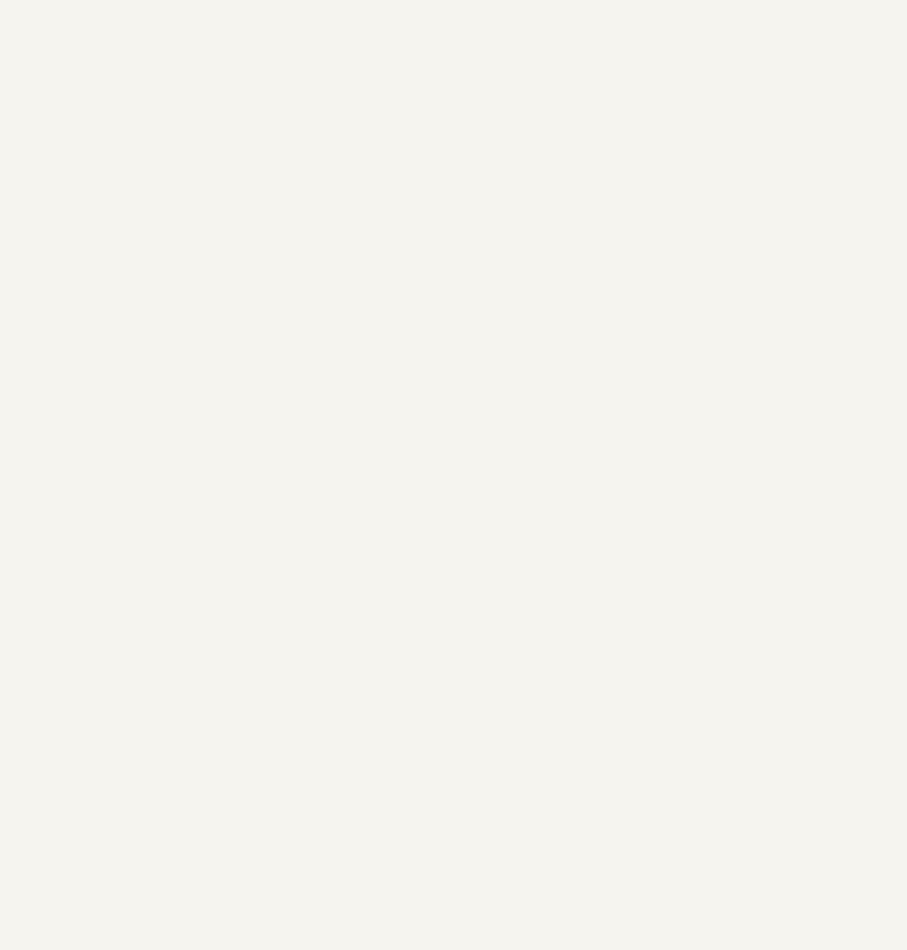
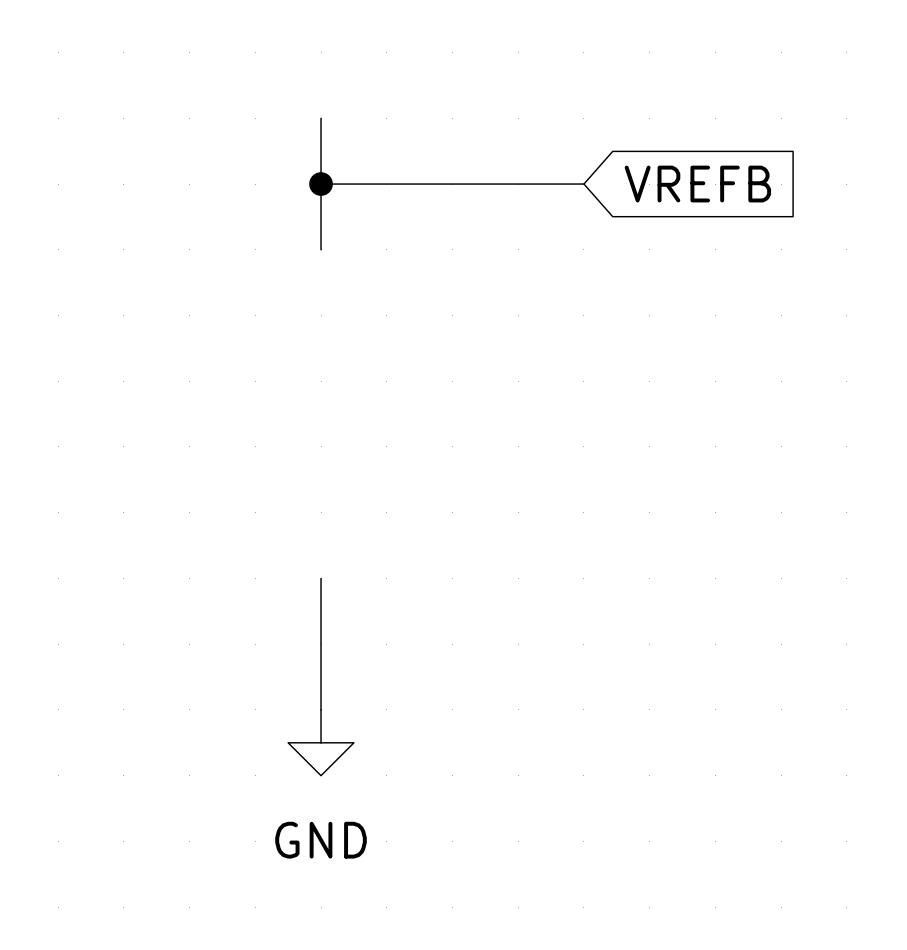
wire: none -> (321, 118) (321, 249)
wire: none -> (321, 184) (583, 184)
junction: none -> (321, 184)
global label: none -> VREFB (697, 184)
wire: none -> (321, 578) (321, 709)
power symbol: none -> GND (321, 742)

